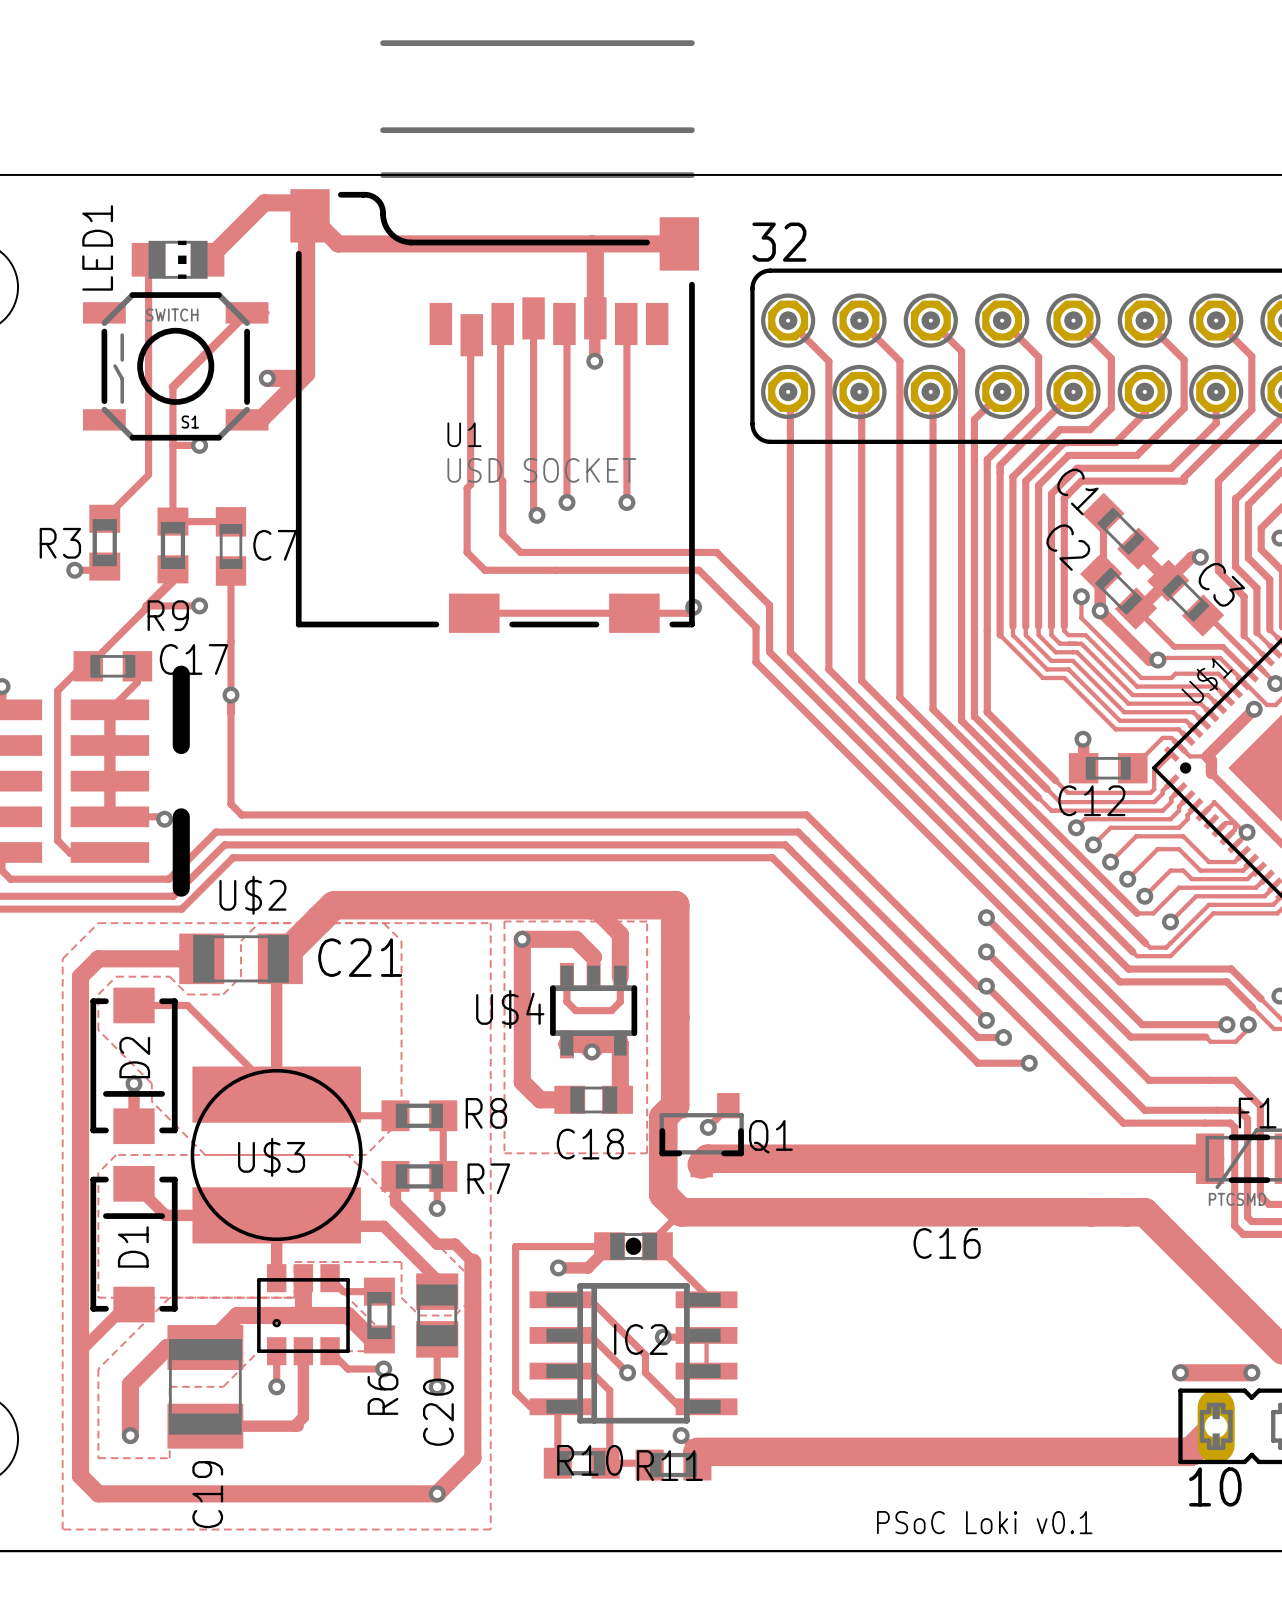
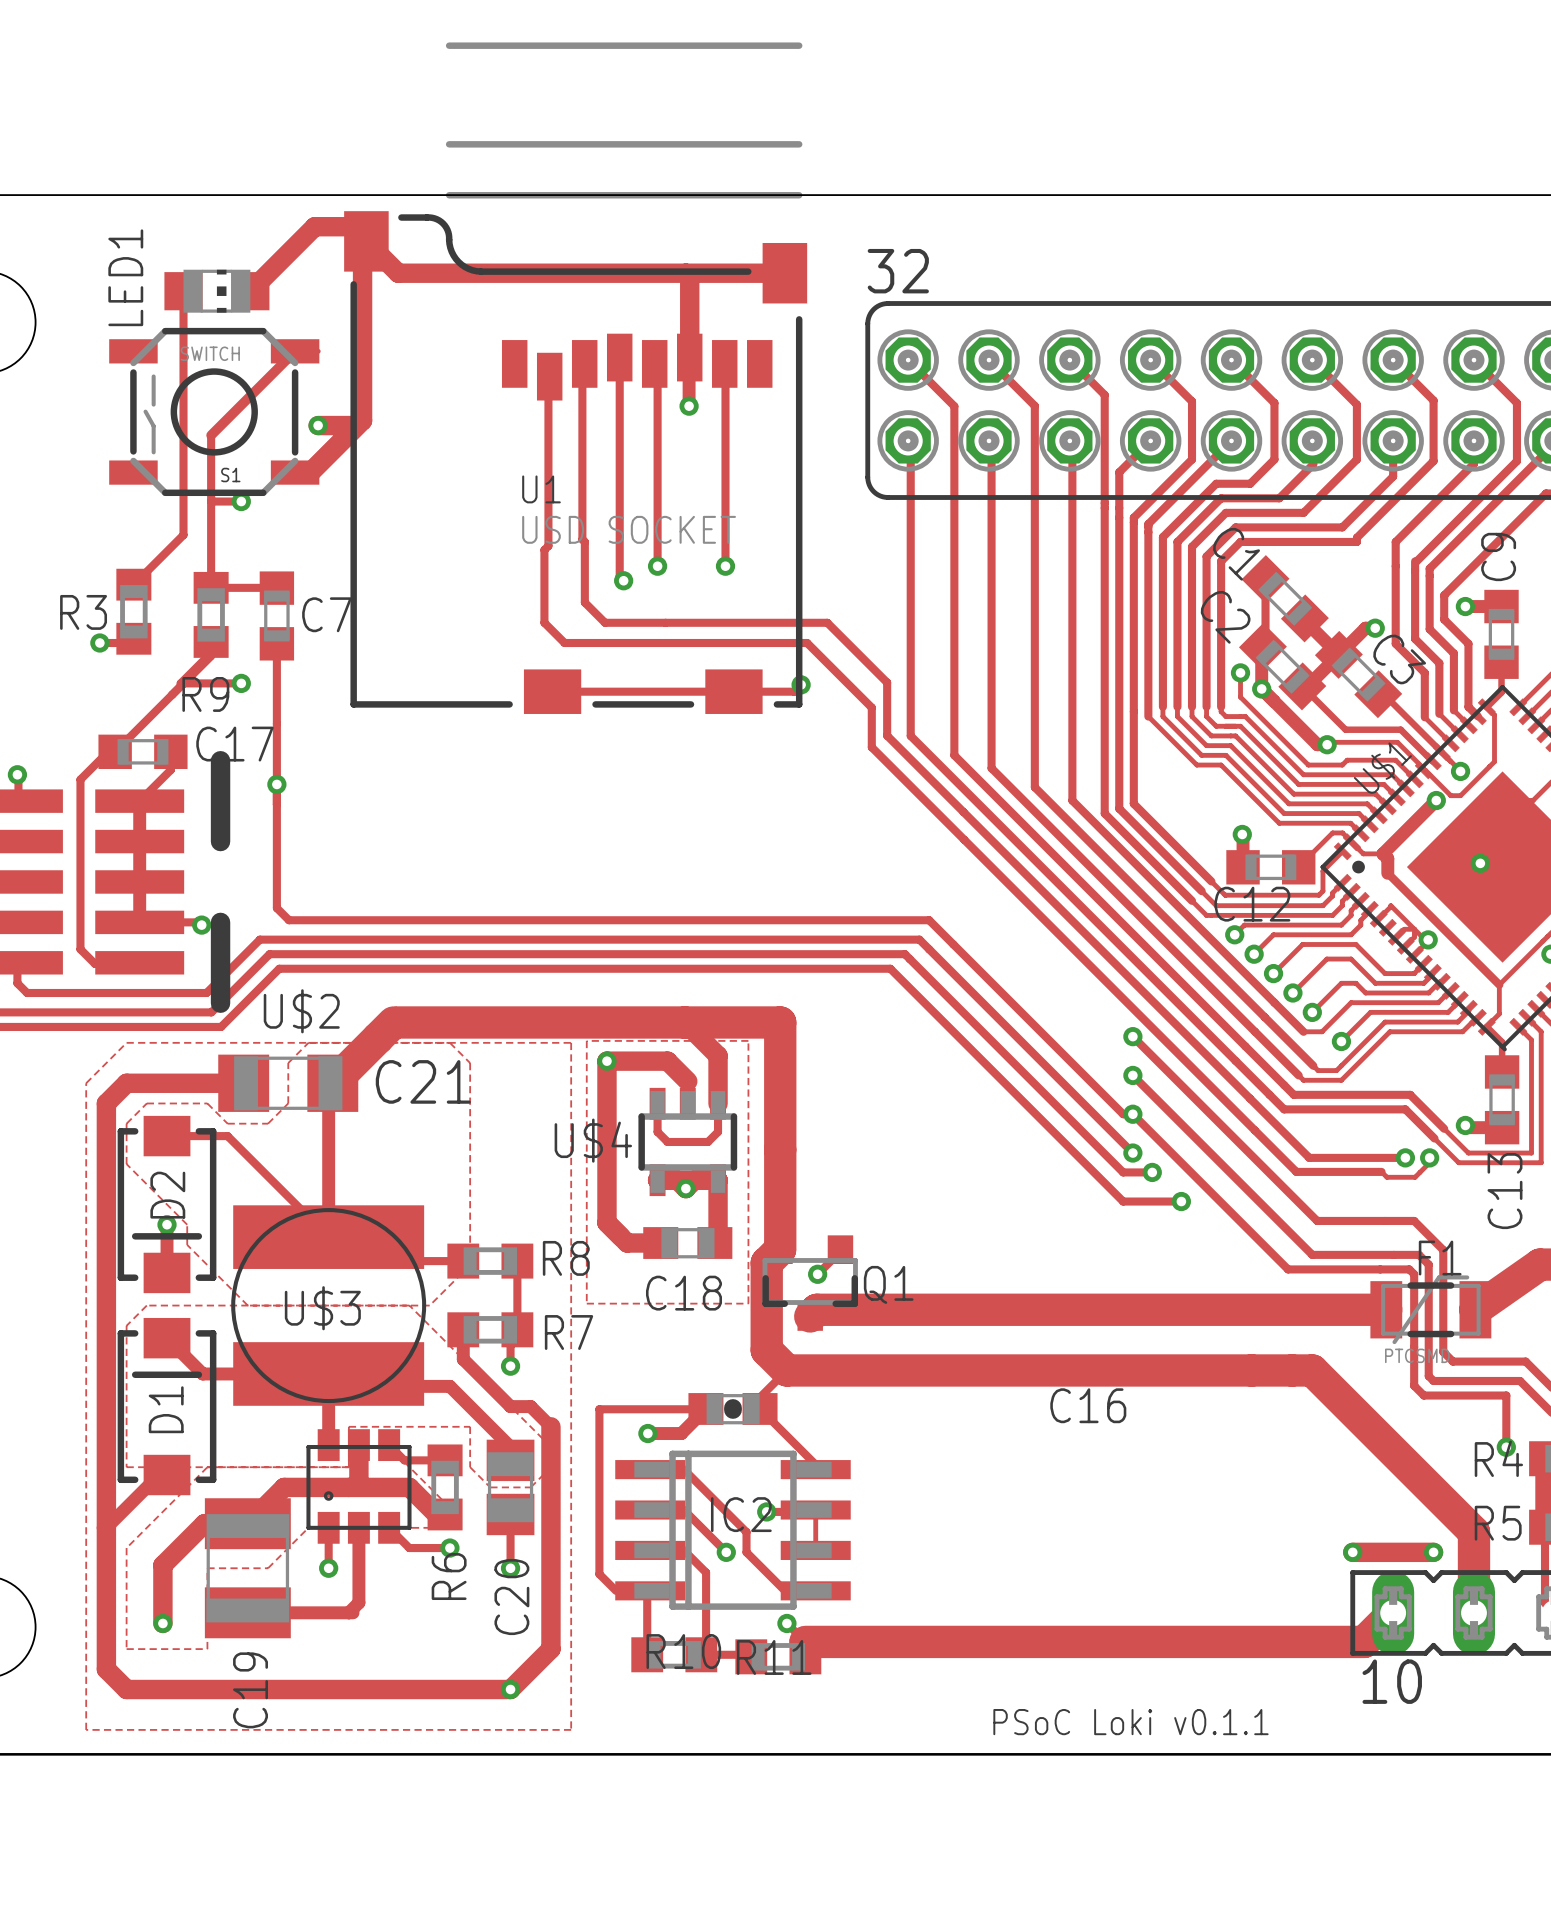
text: PSoC Loki v0.1 (984, 1522) -> PSoC Loki v0.1.1 (1130, 1722)

